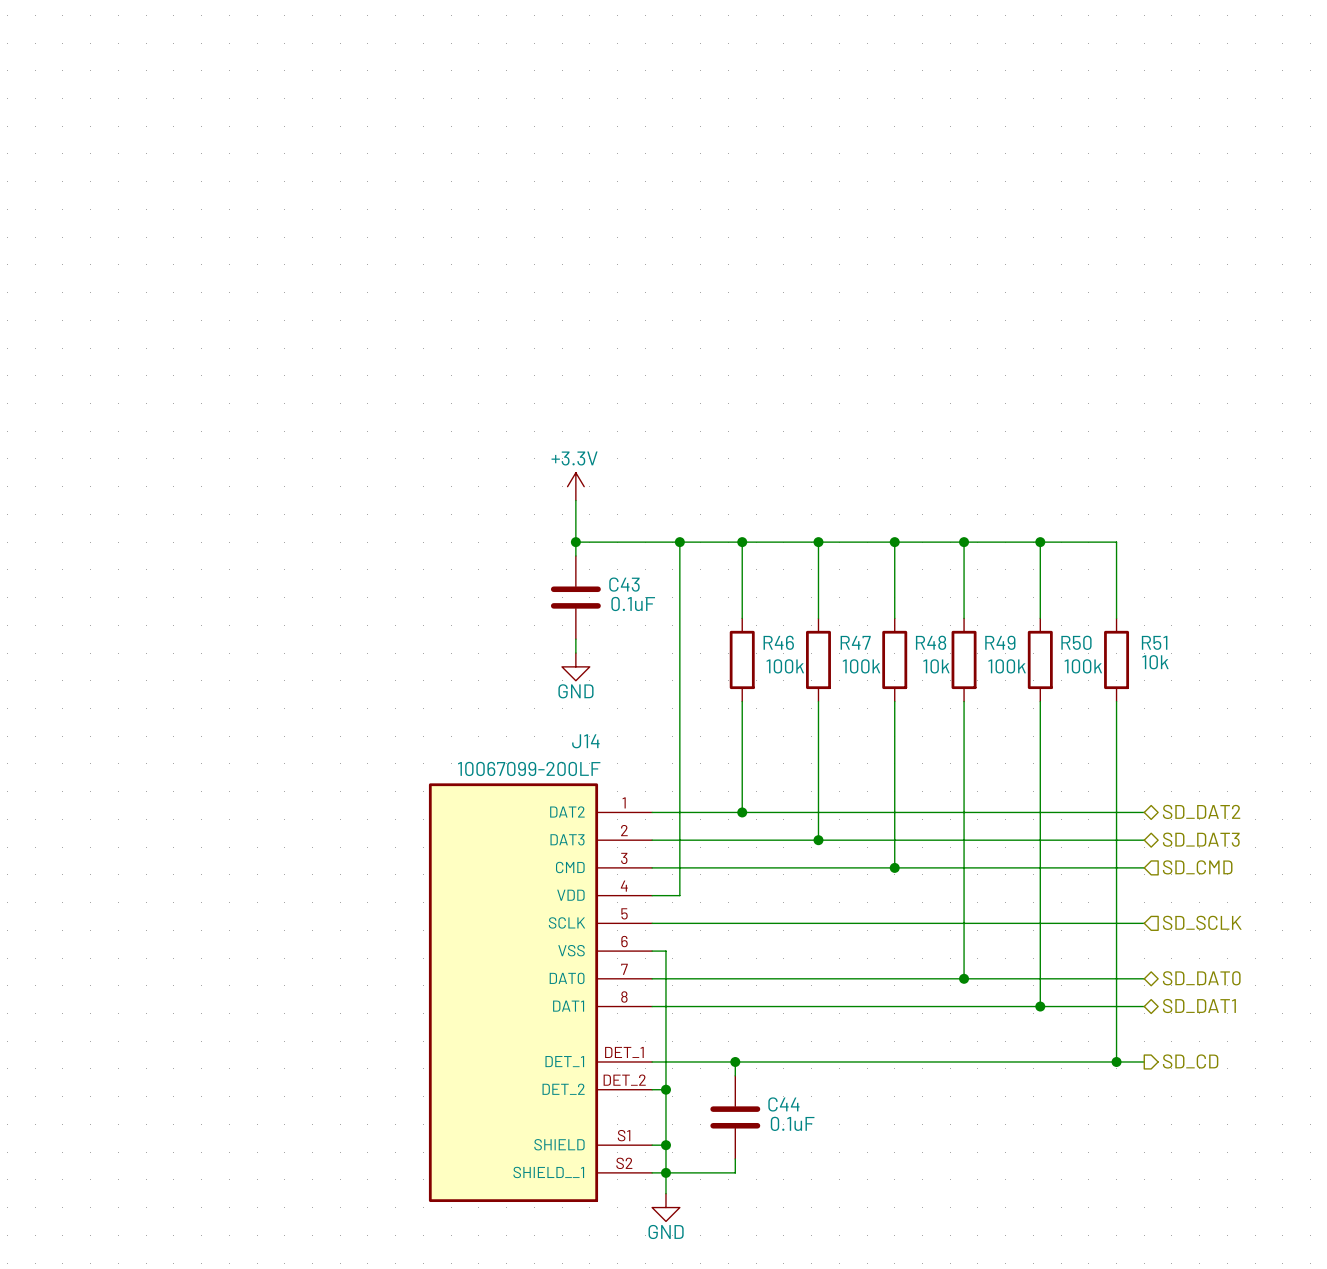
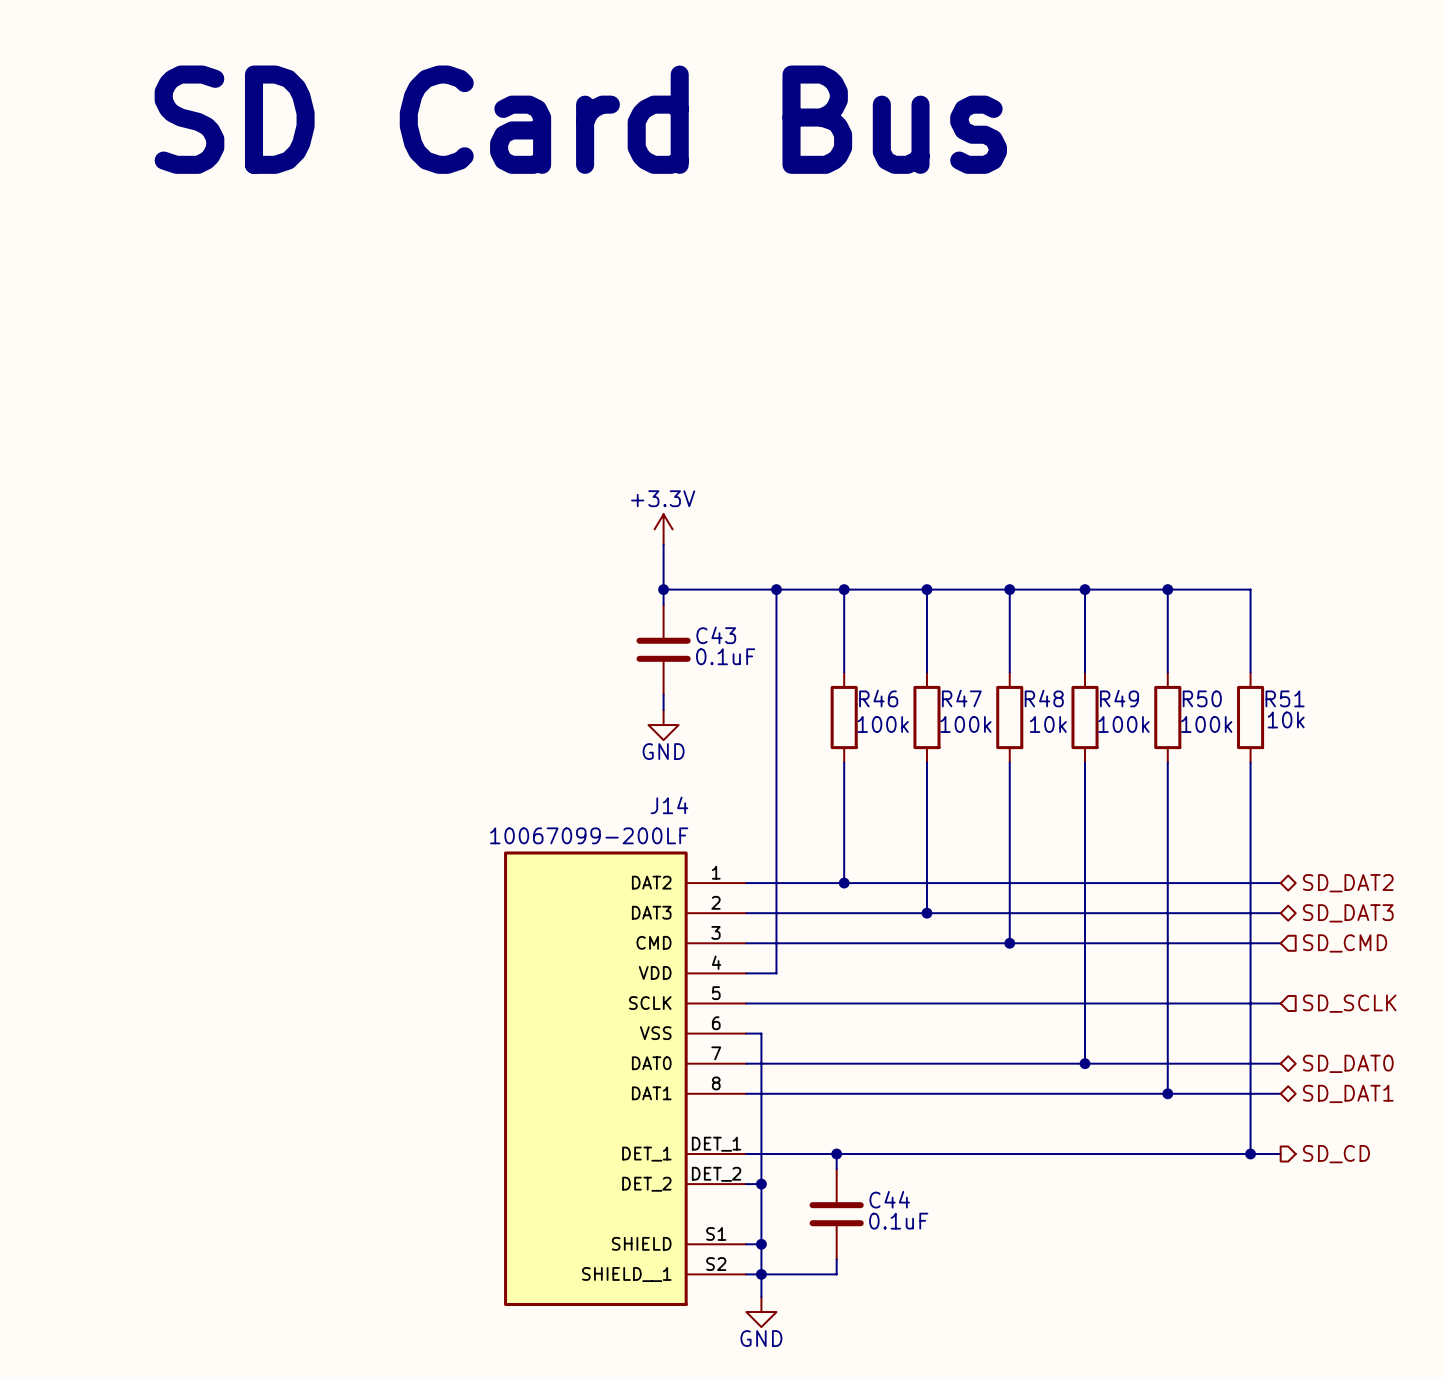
text: none -> SD Card Bus (580, 119)

